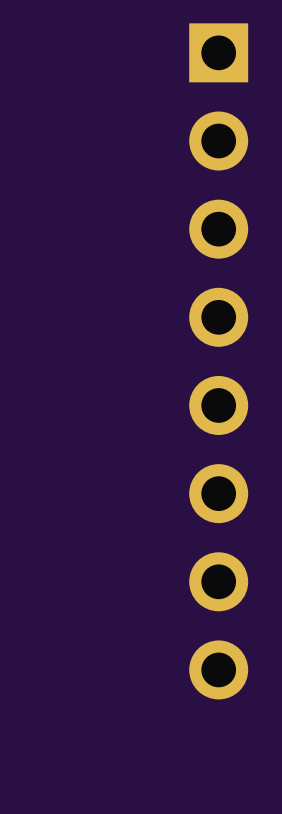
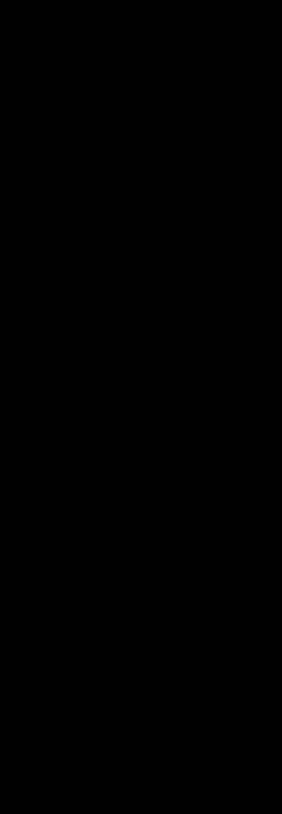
part: (218, 361) -> none

